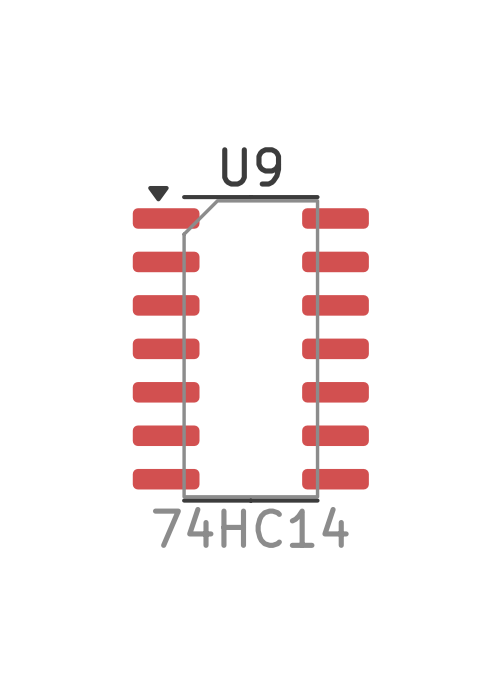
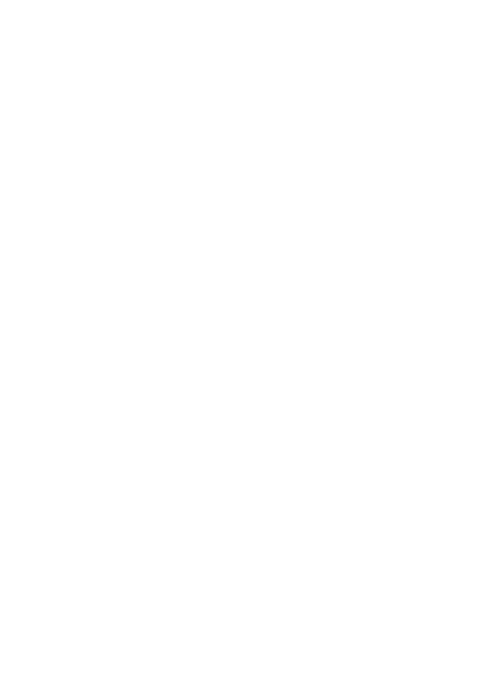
U9: 74HC14 (250, 344) -> none

